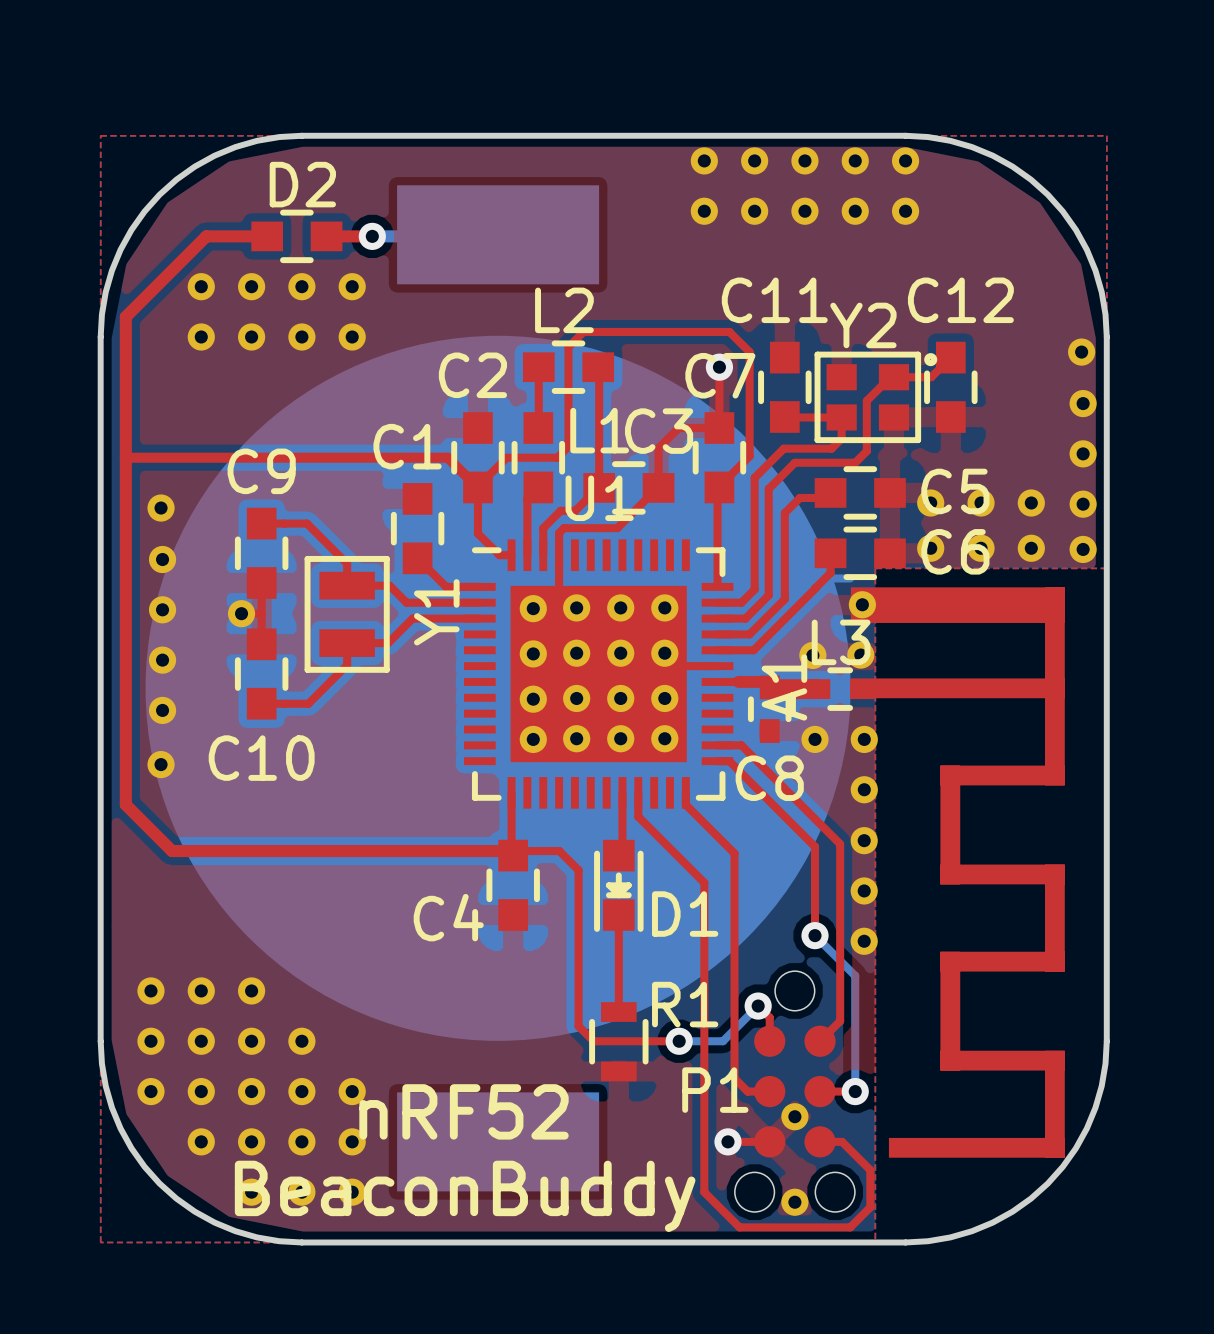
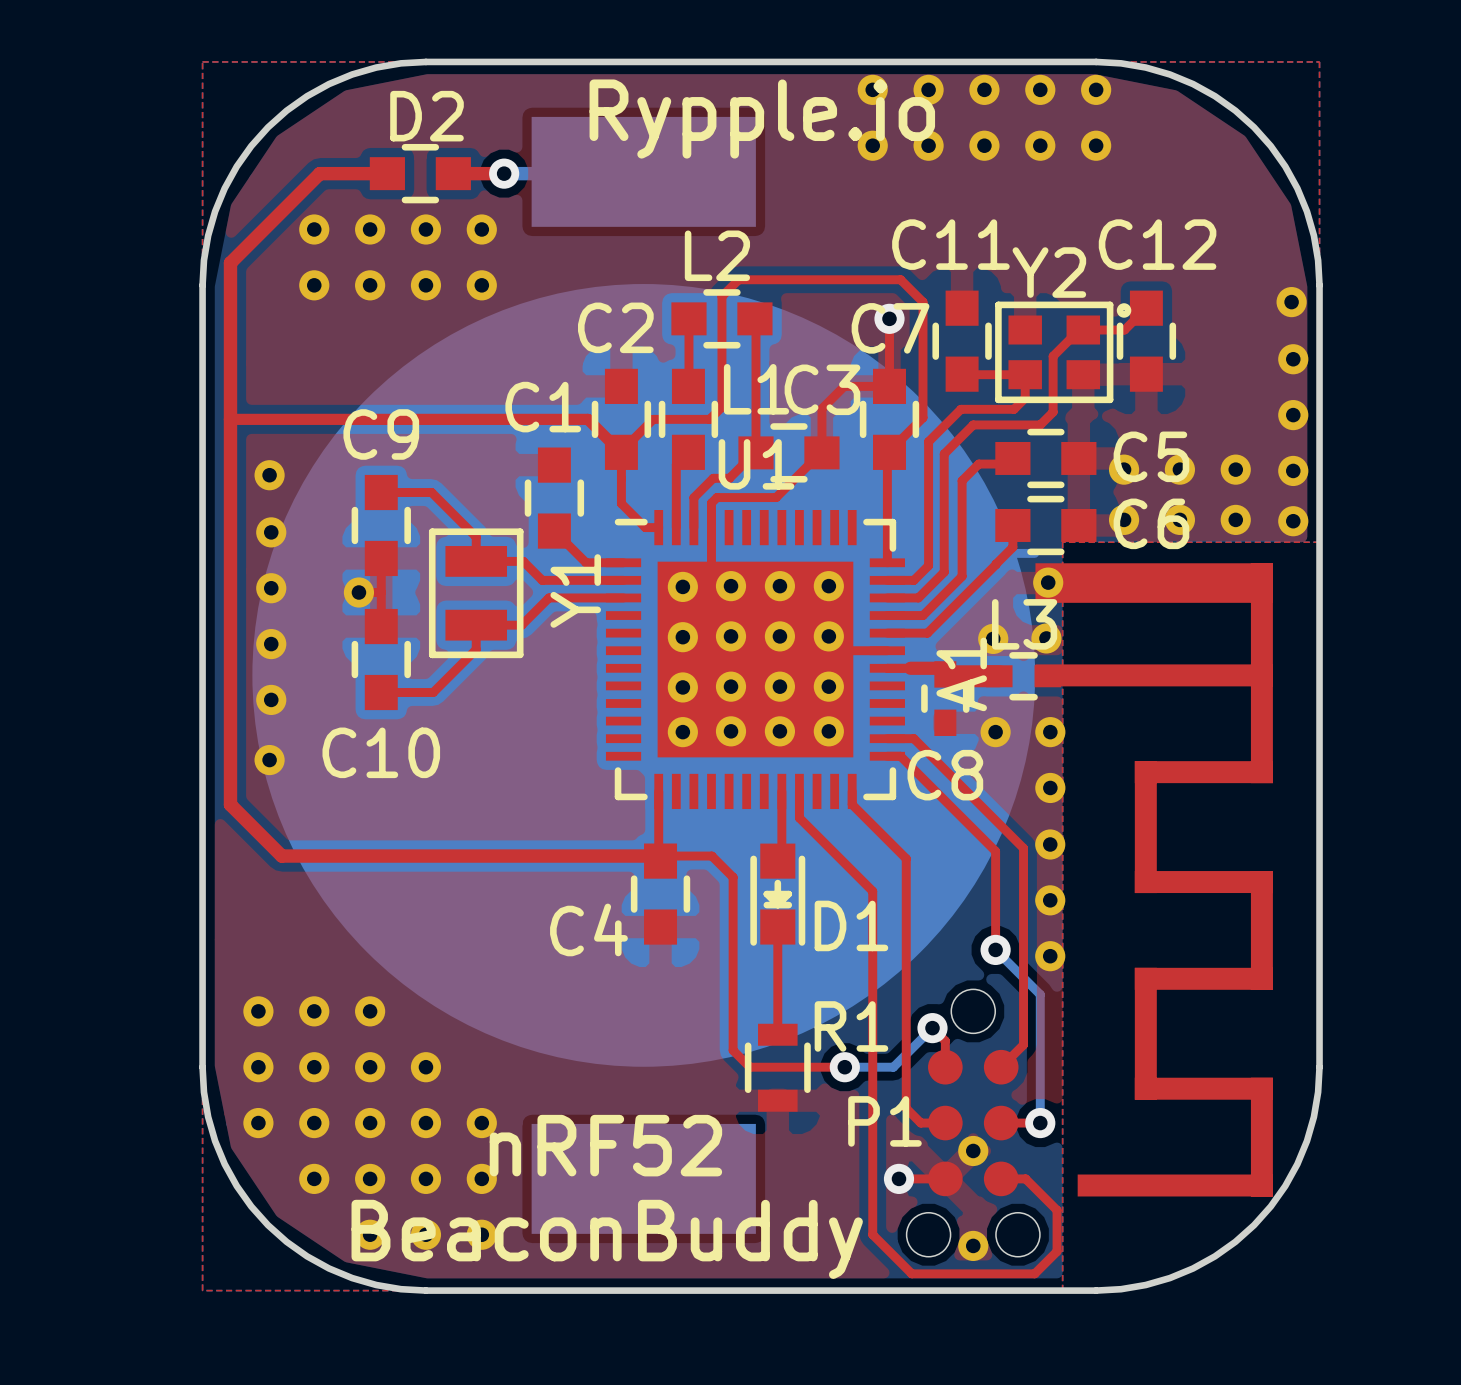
text: none -> Rypple.io (762, 119)

